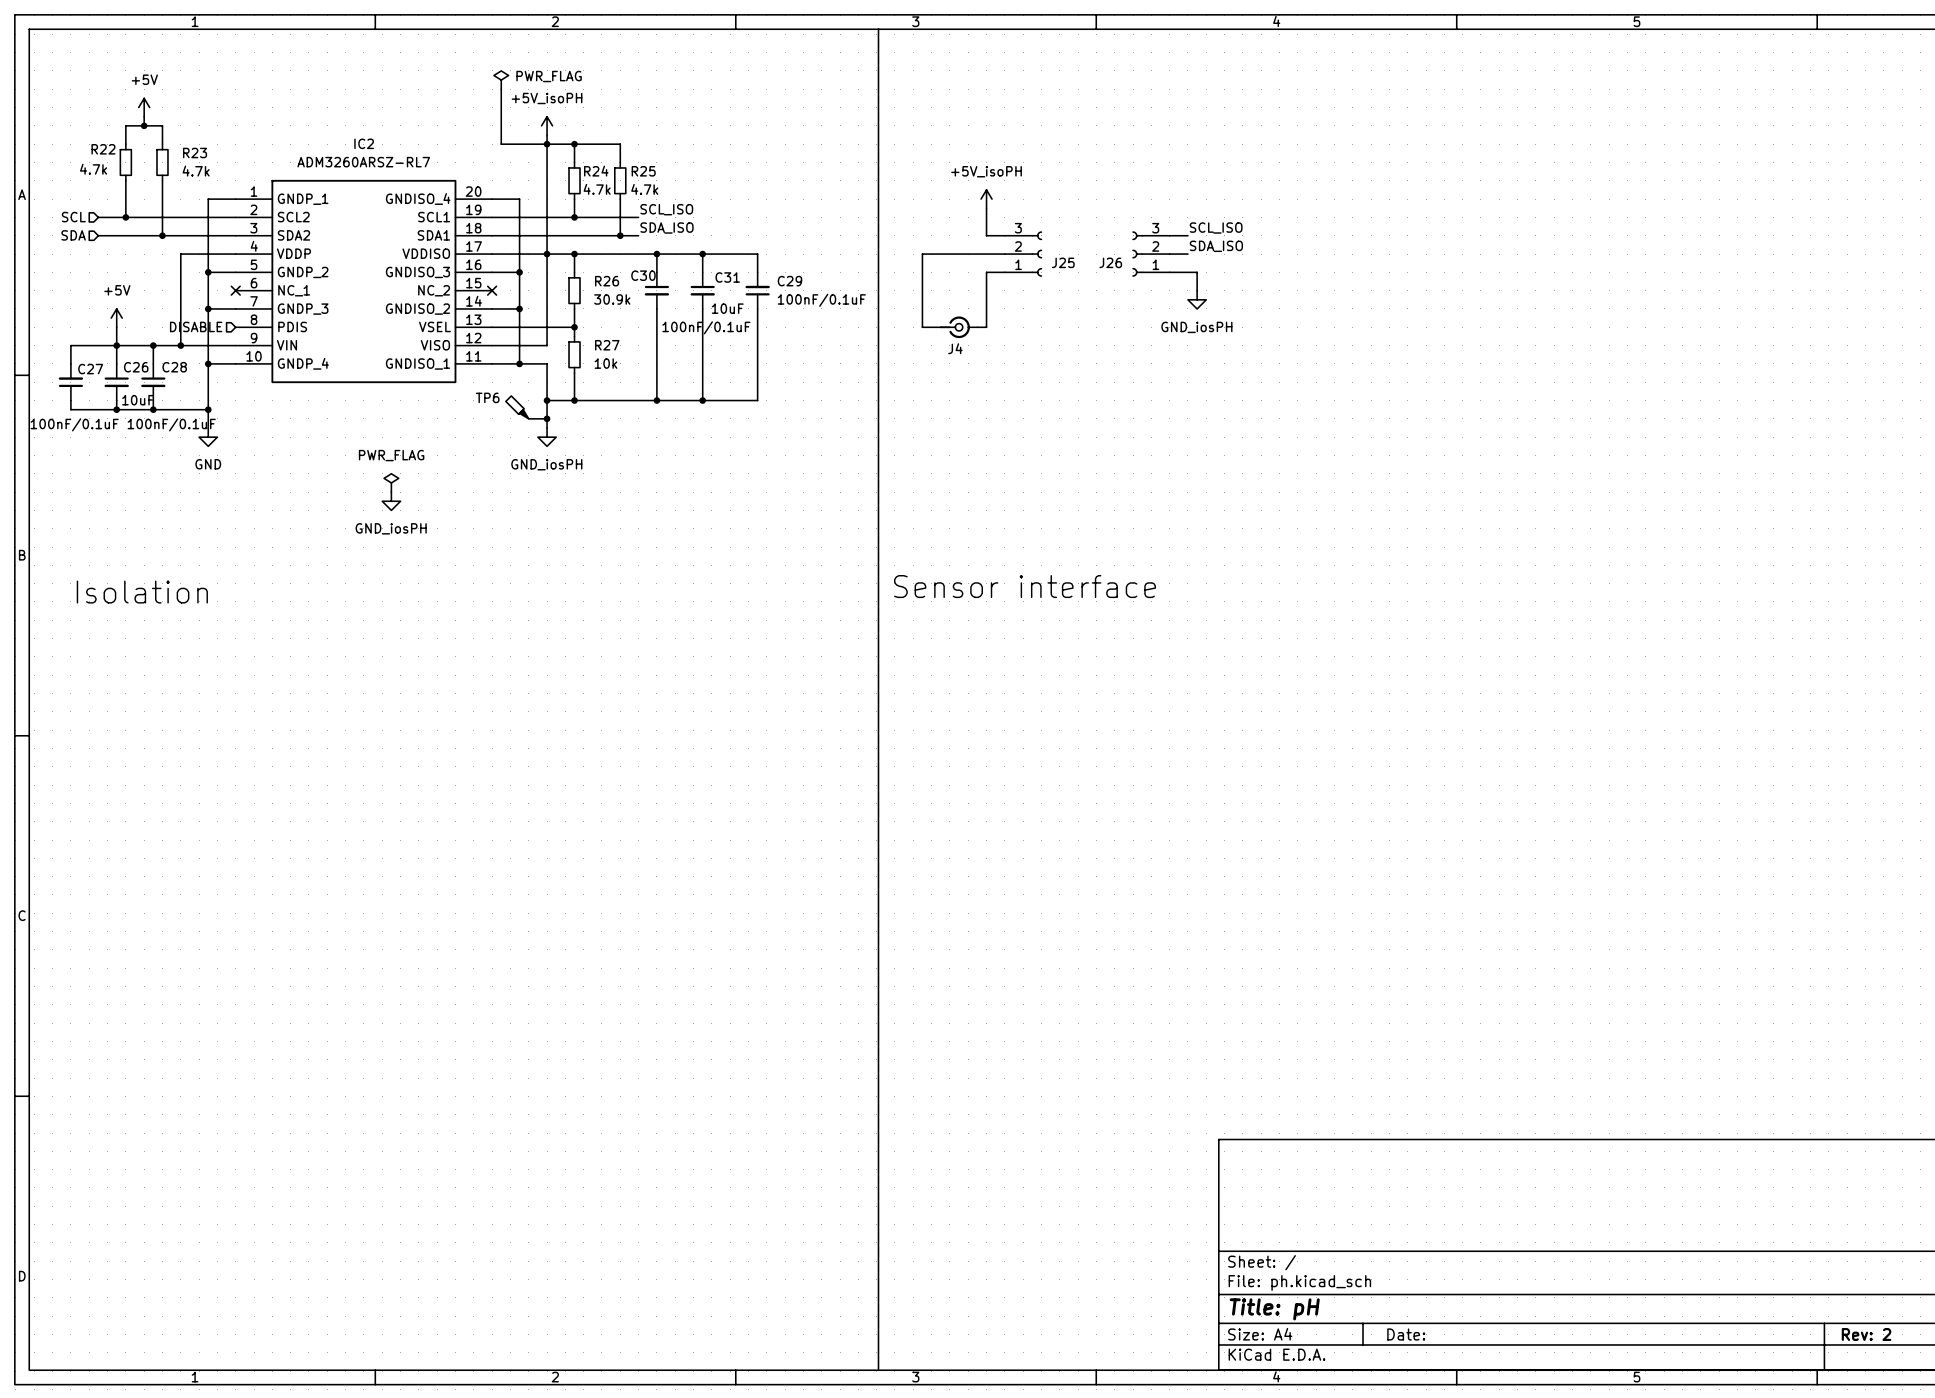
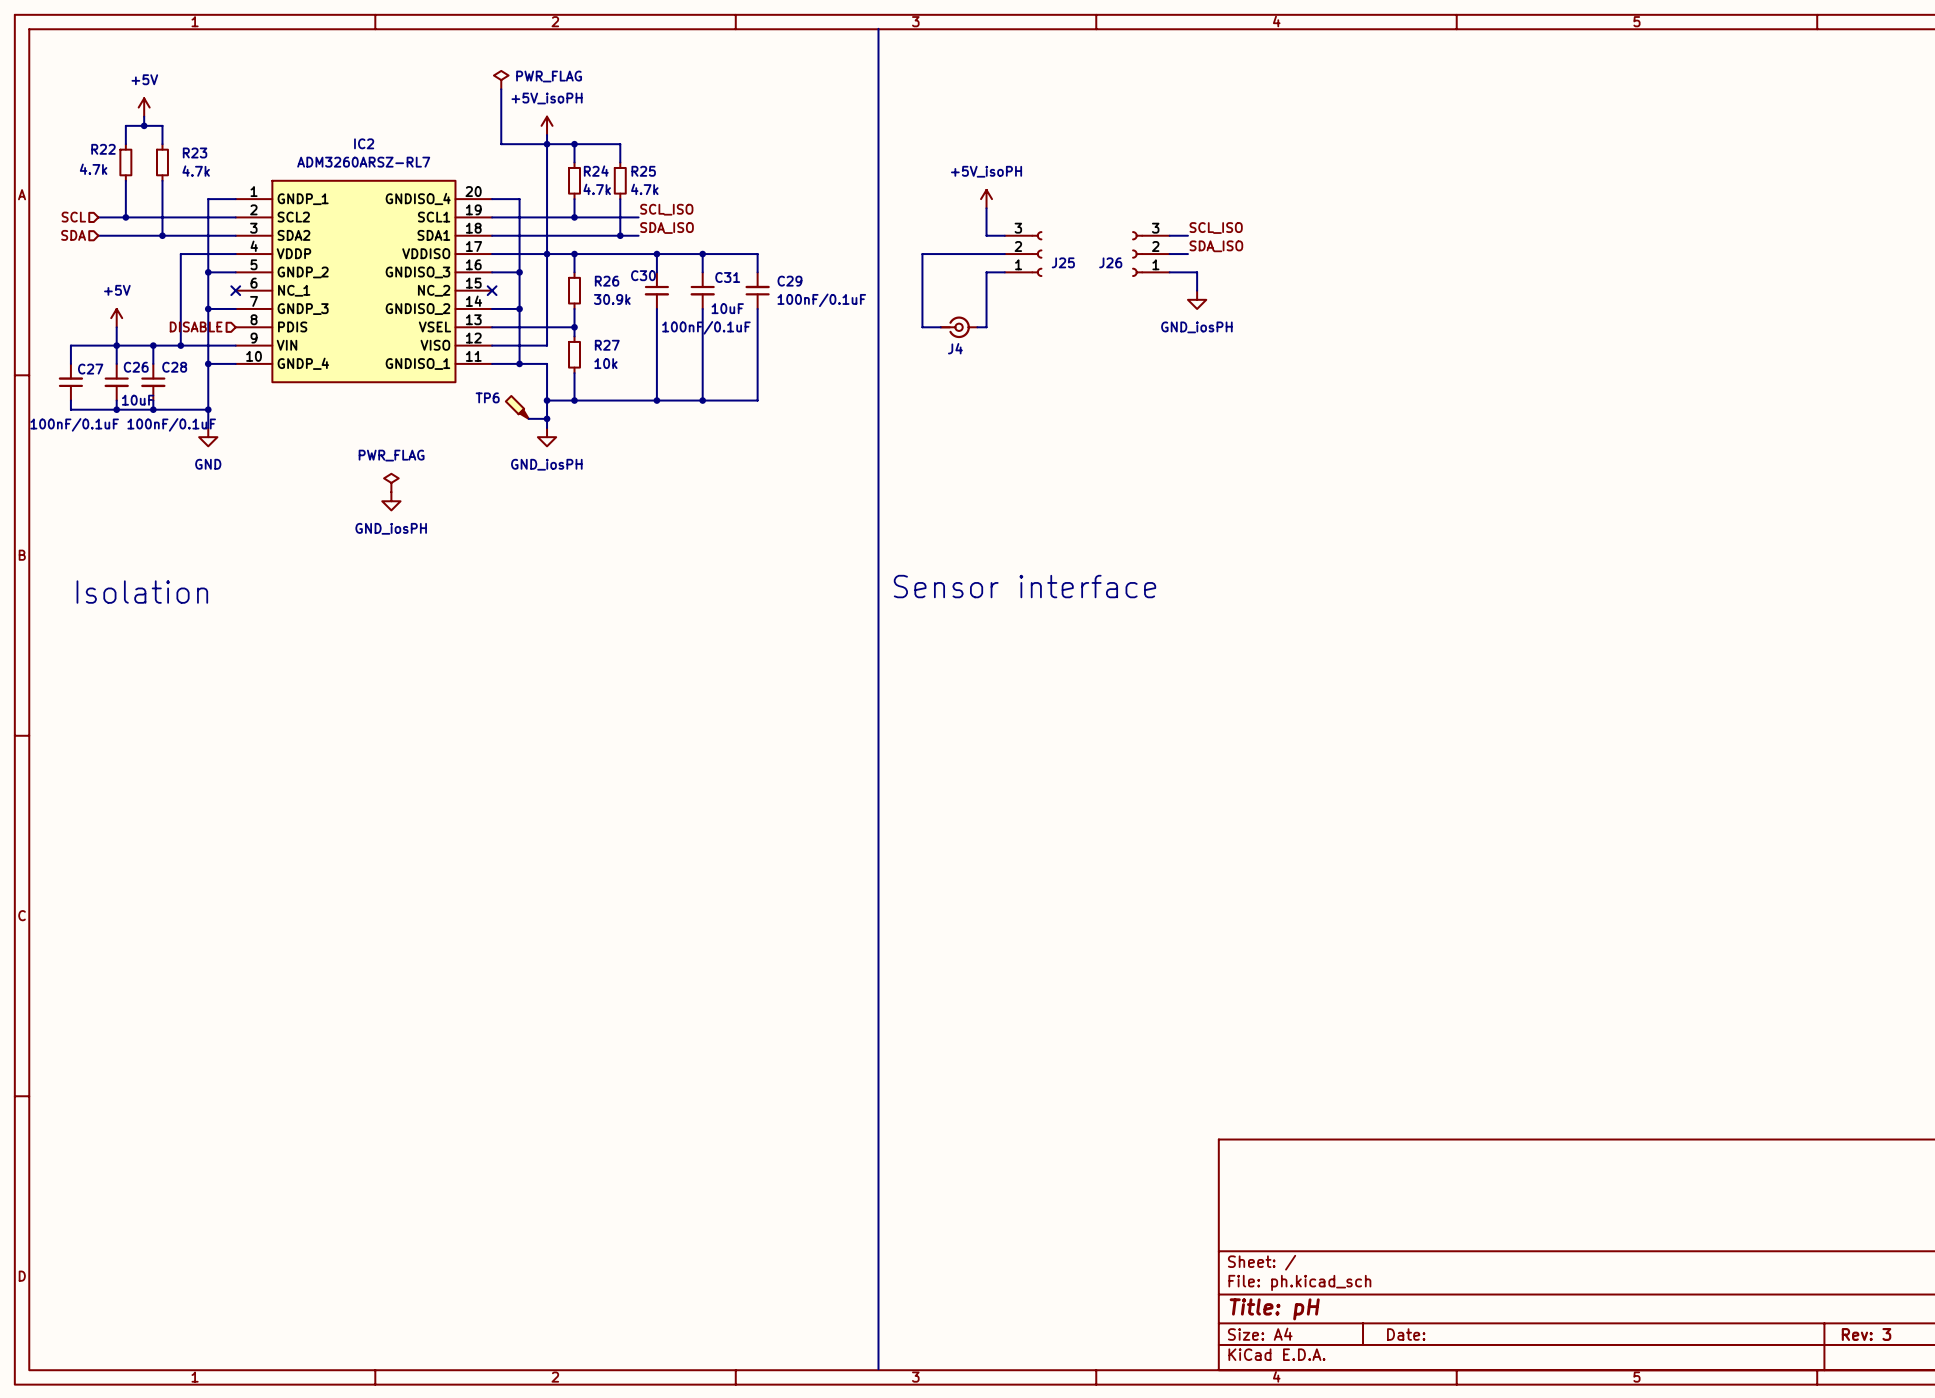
title block: Rev: 2 (1866, 1334) -> Rev: 3 (1866, 1334)

